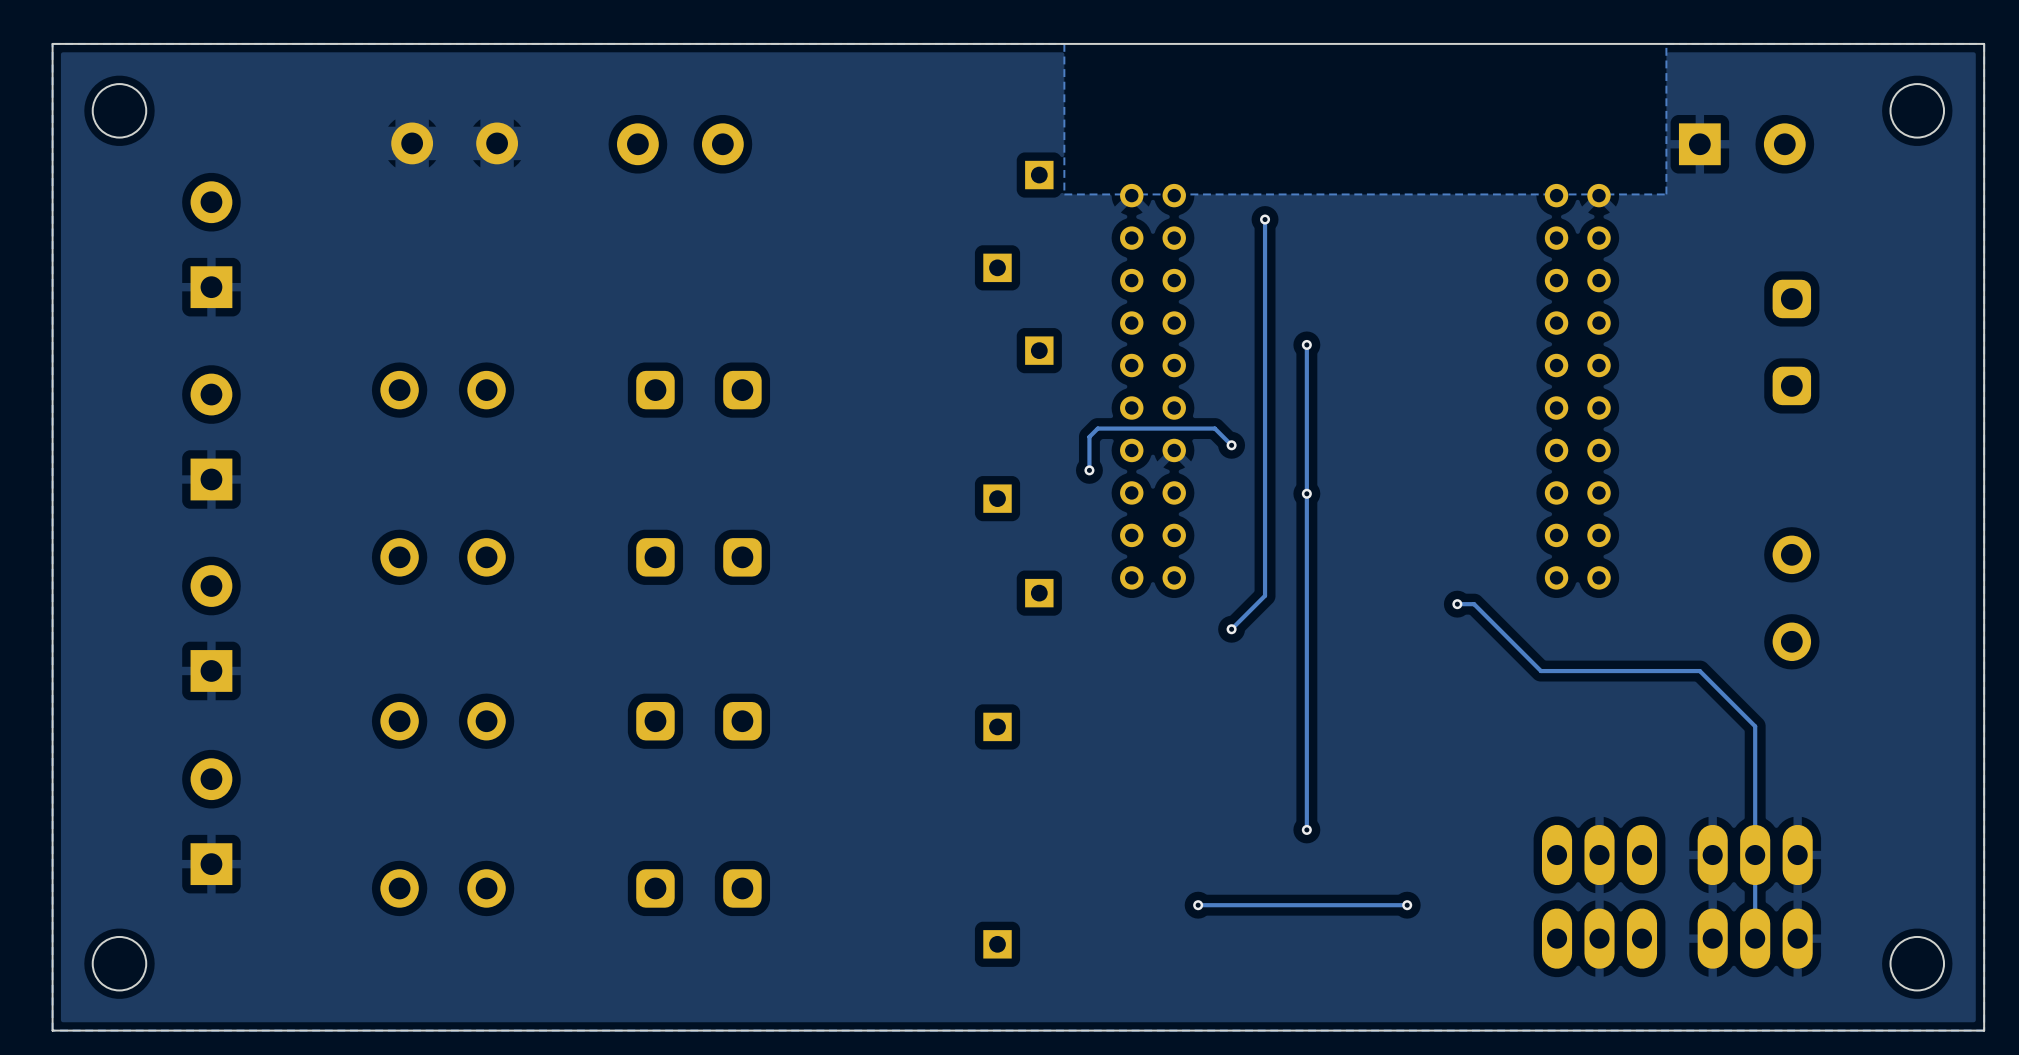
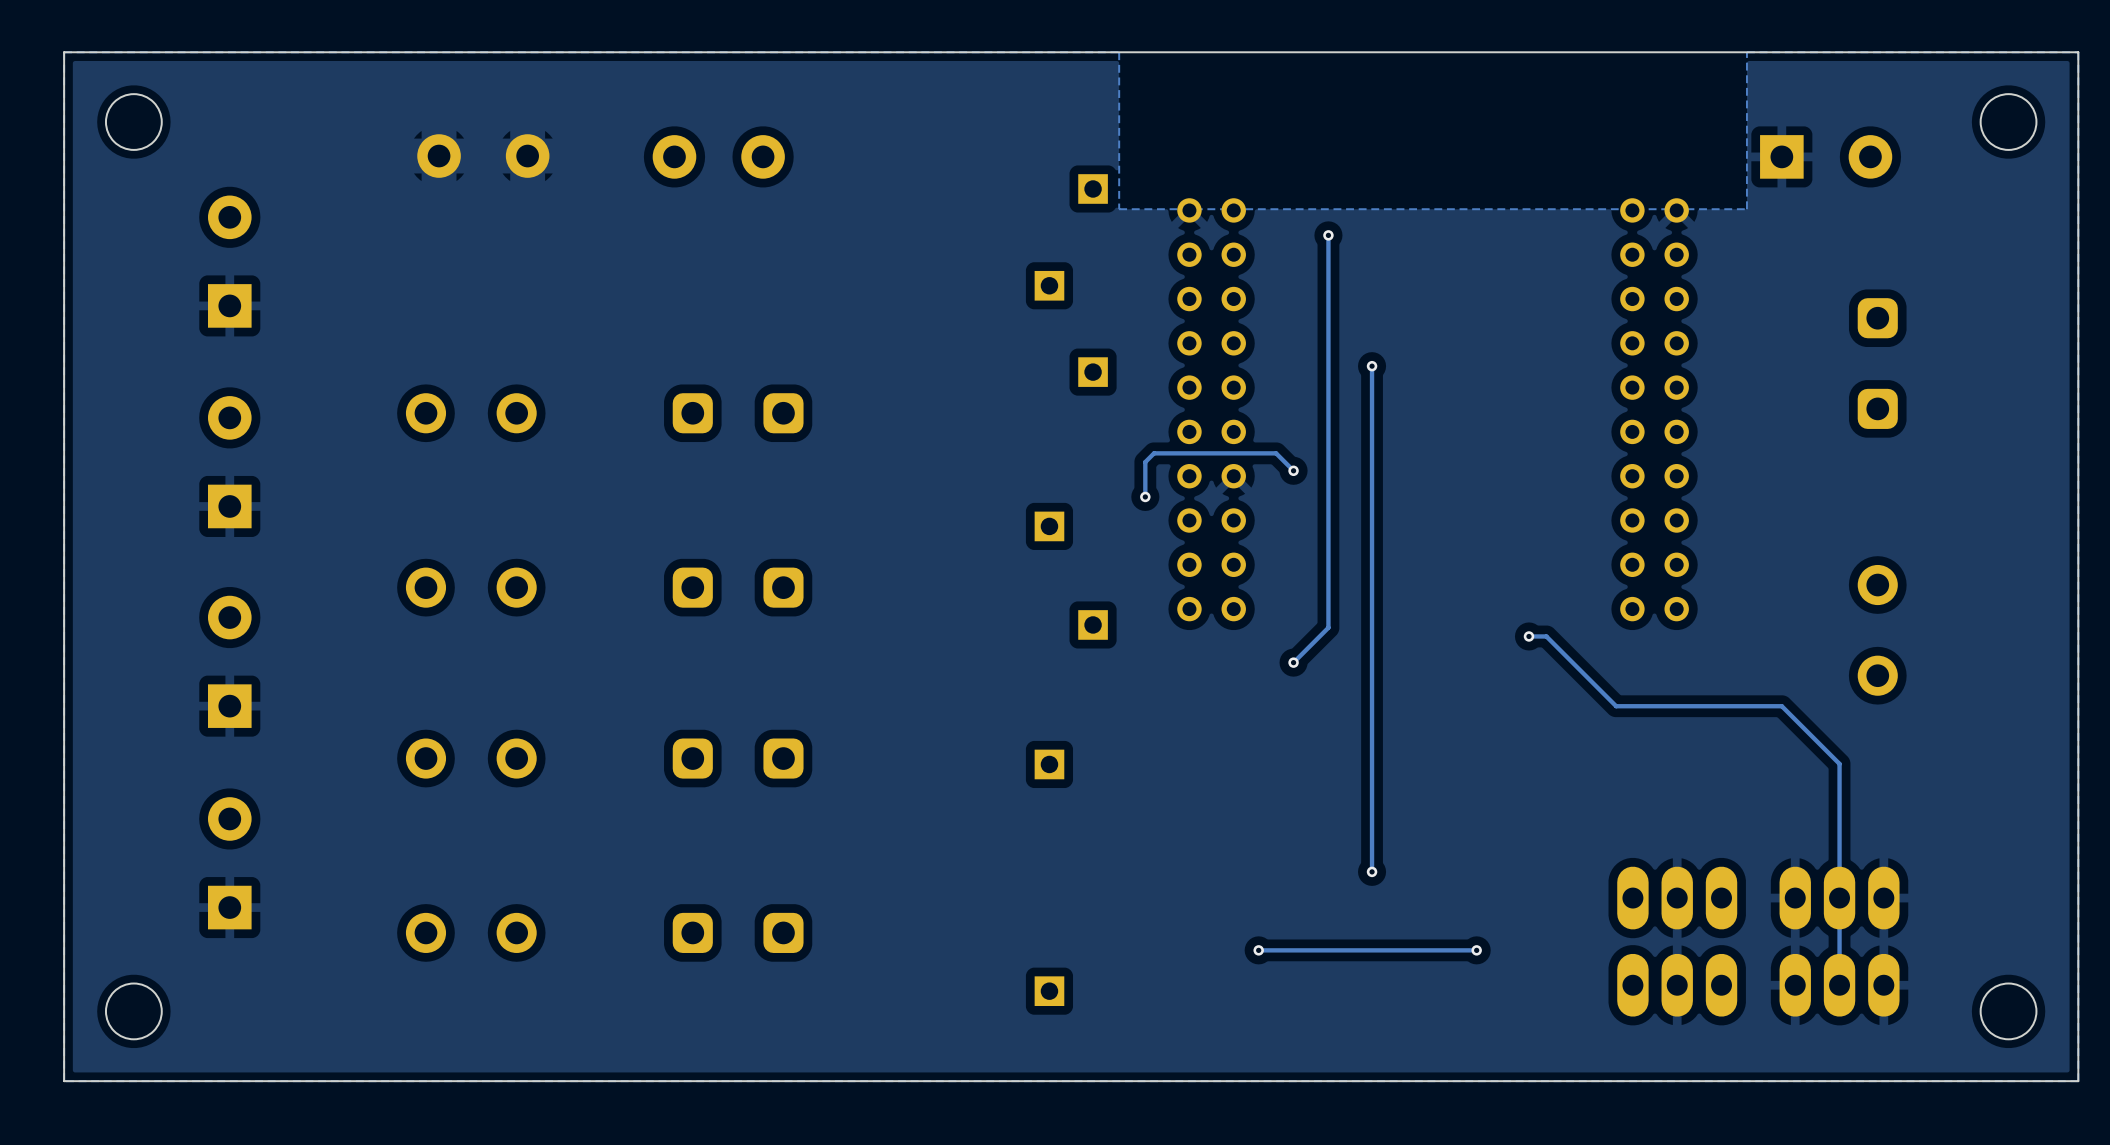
via: (1306, 493) -> none

